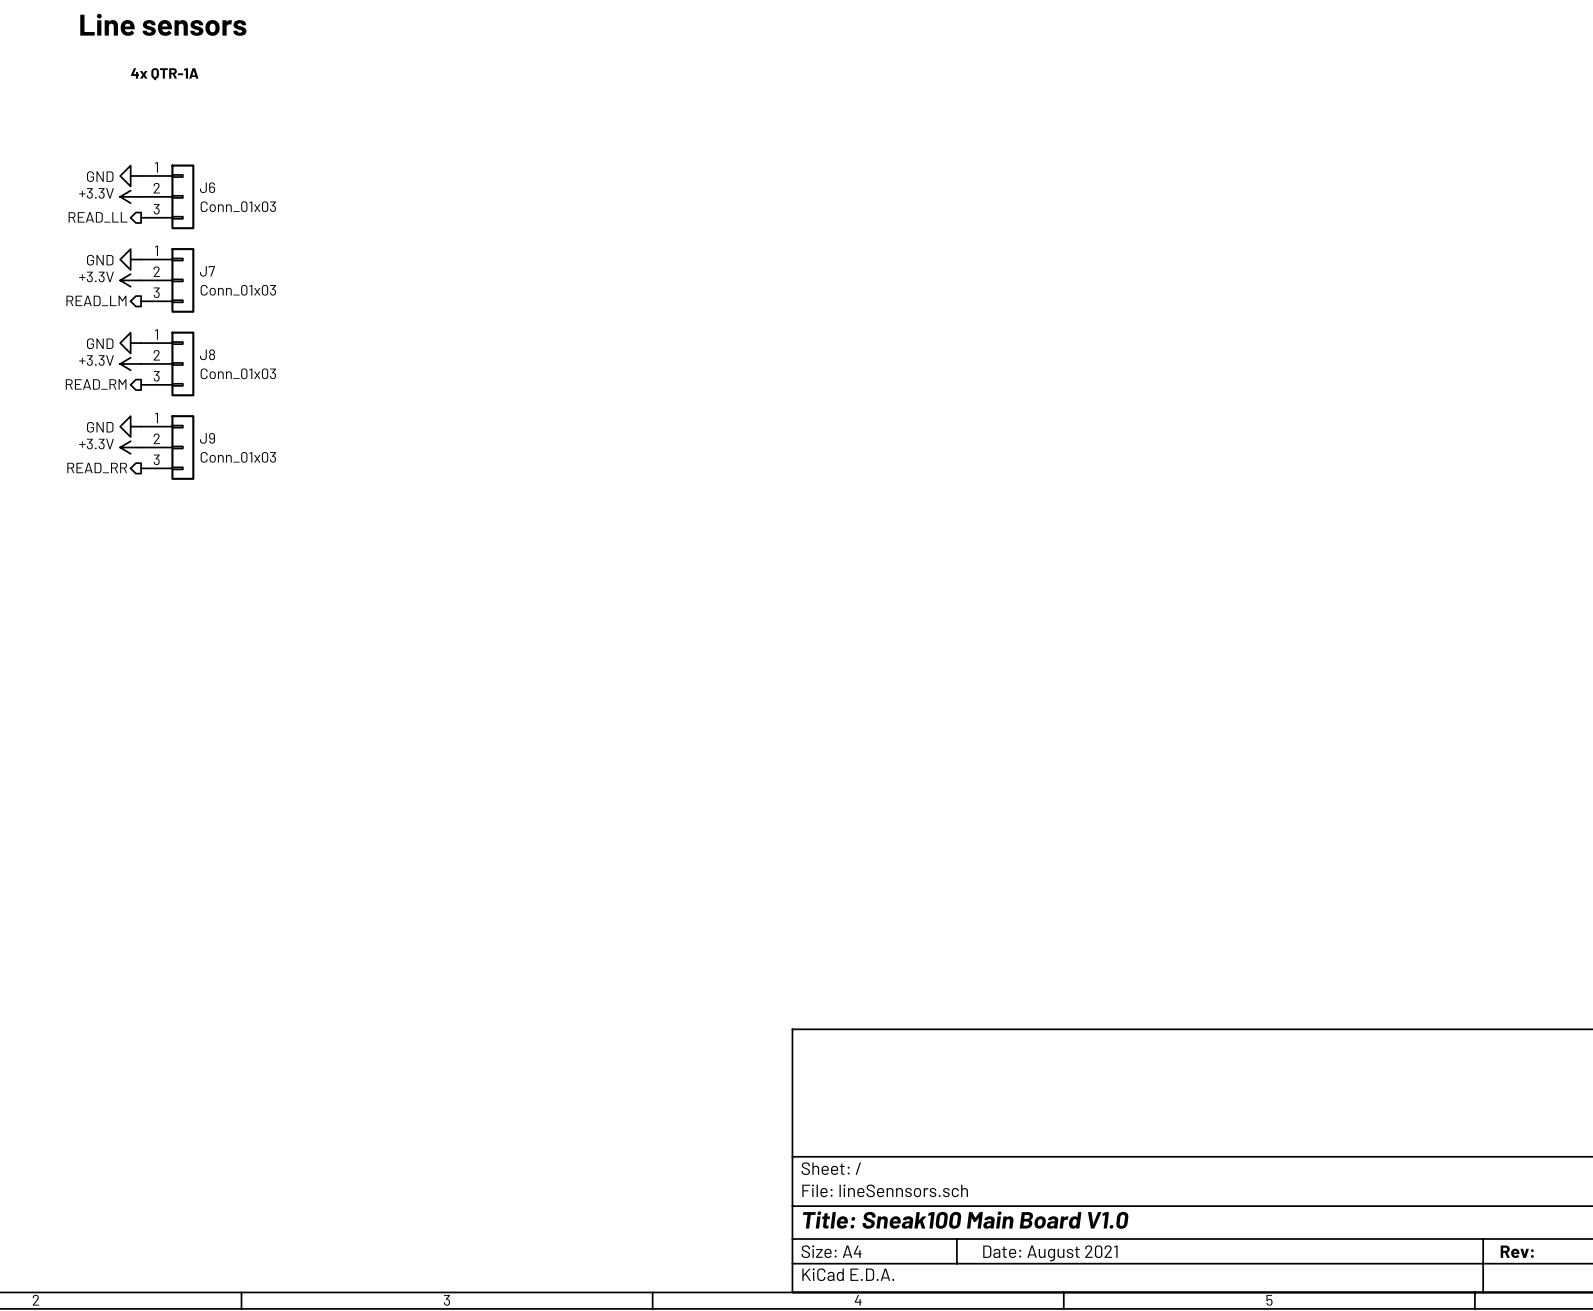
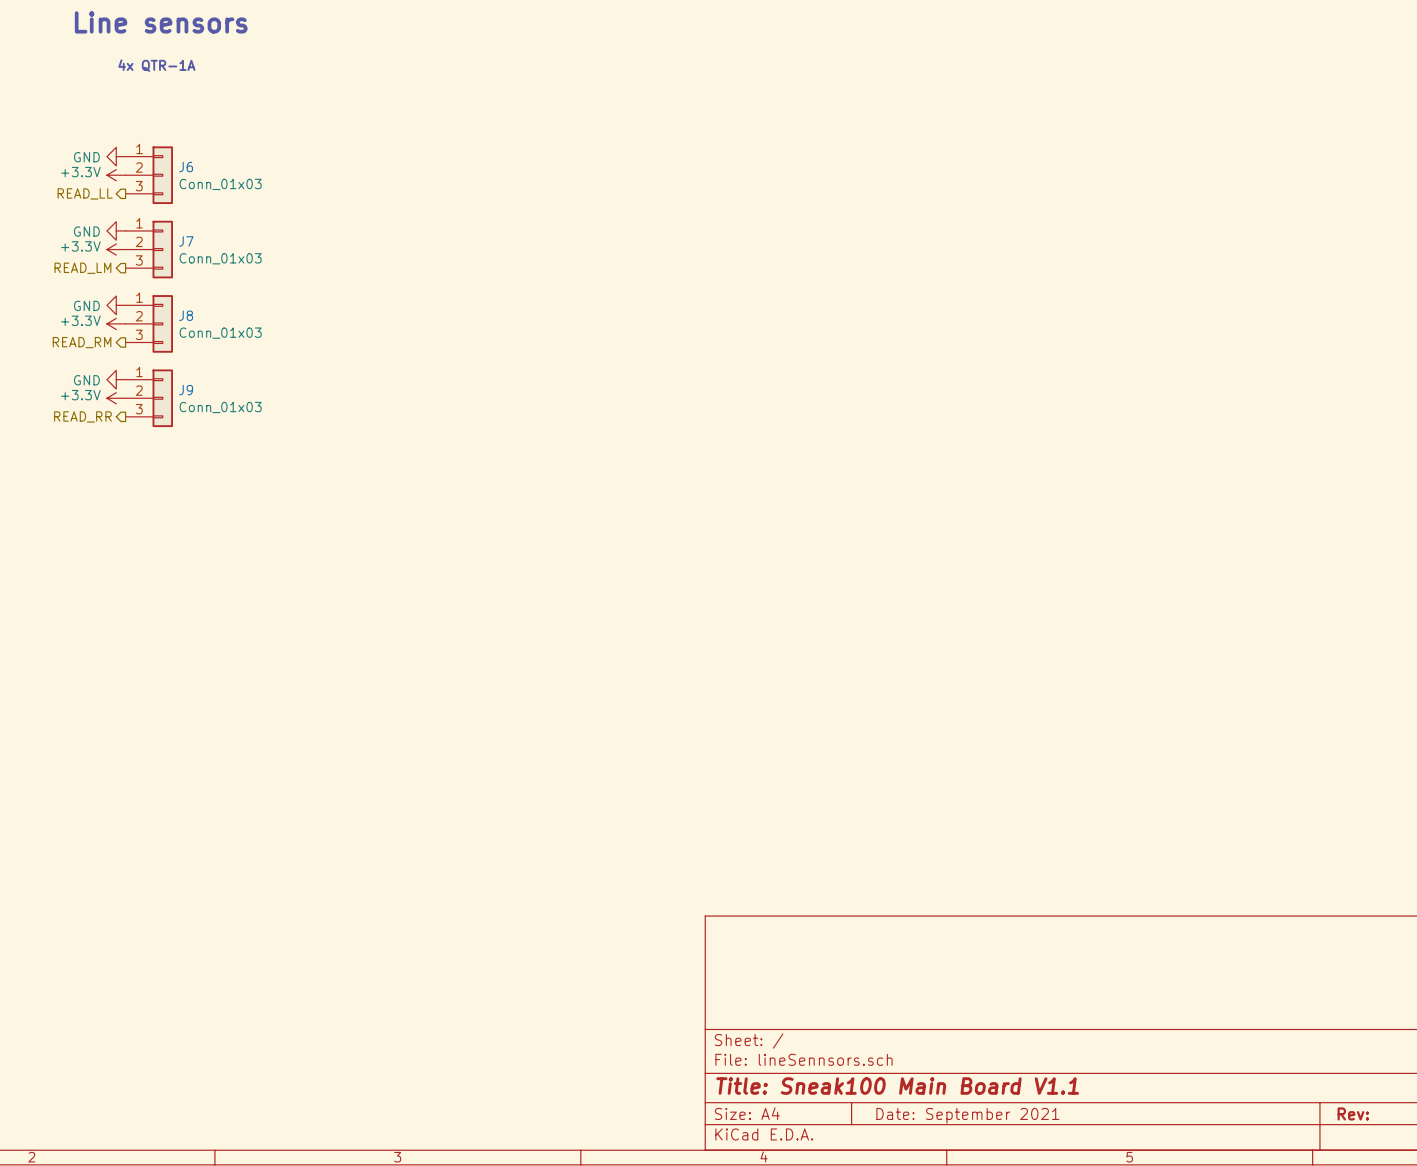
title block: Title: Sneak100 Main Board V1.0 (965, 1220) -> Title: Sneak100 Main Board V1.1 (897, 1086)
title block: Date: August 2021 (1050, 1253) -> Date: September 2021 (967, 1115)

